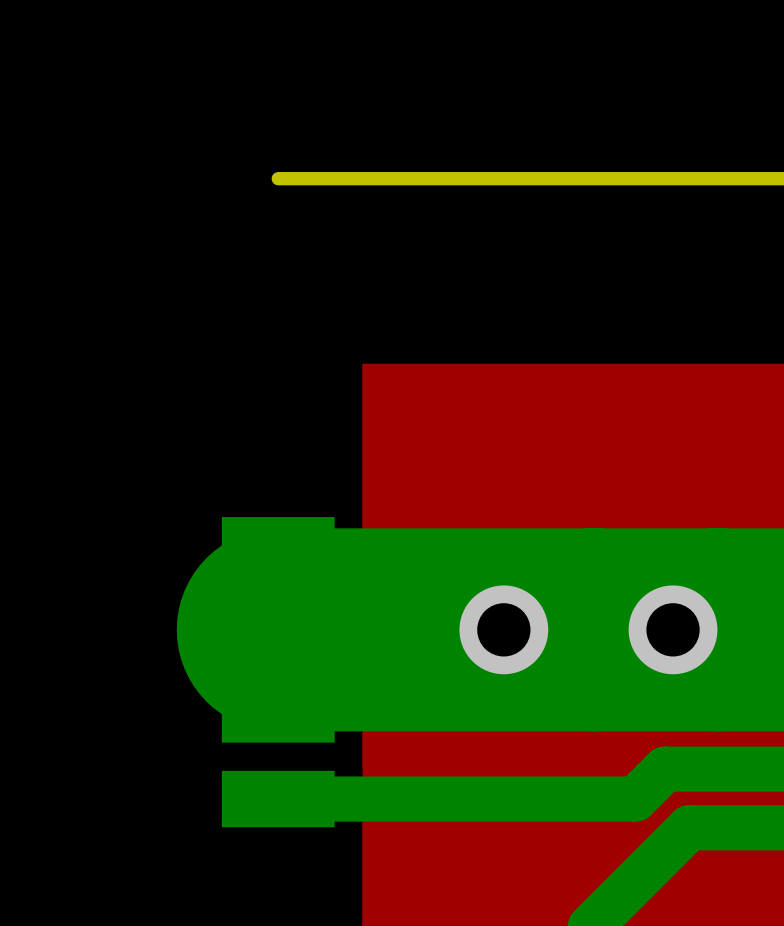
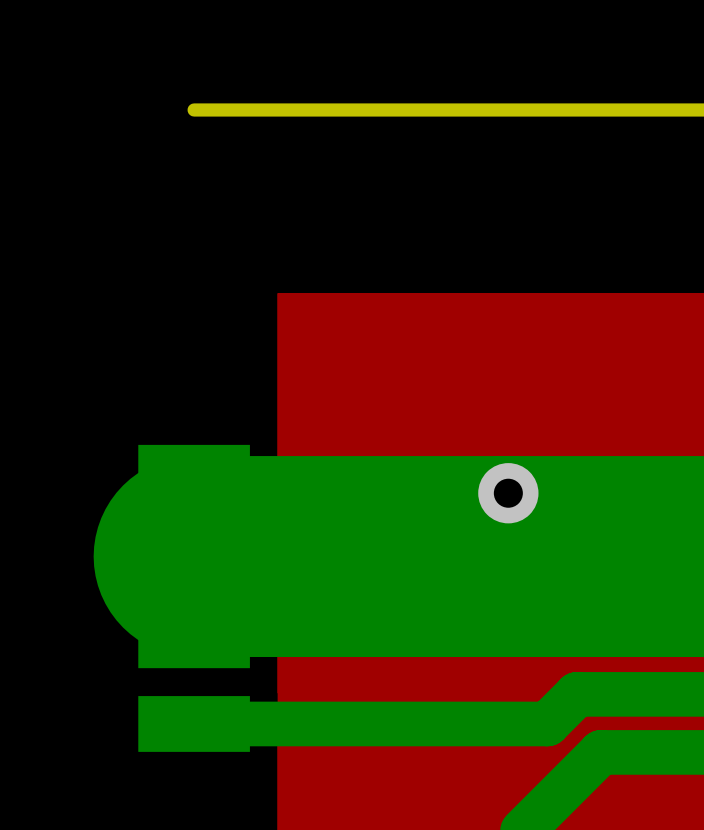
via: none -> (508, 493)
via: (503, 629) -> none
via: (673, 629) -> none

